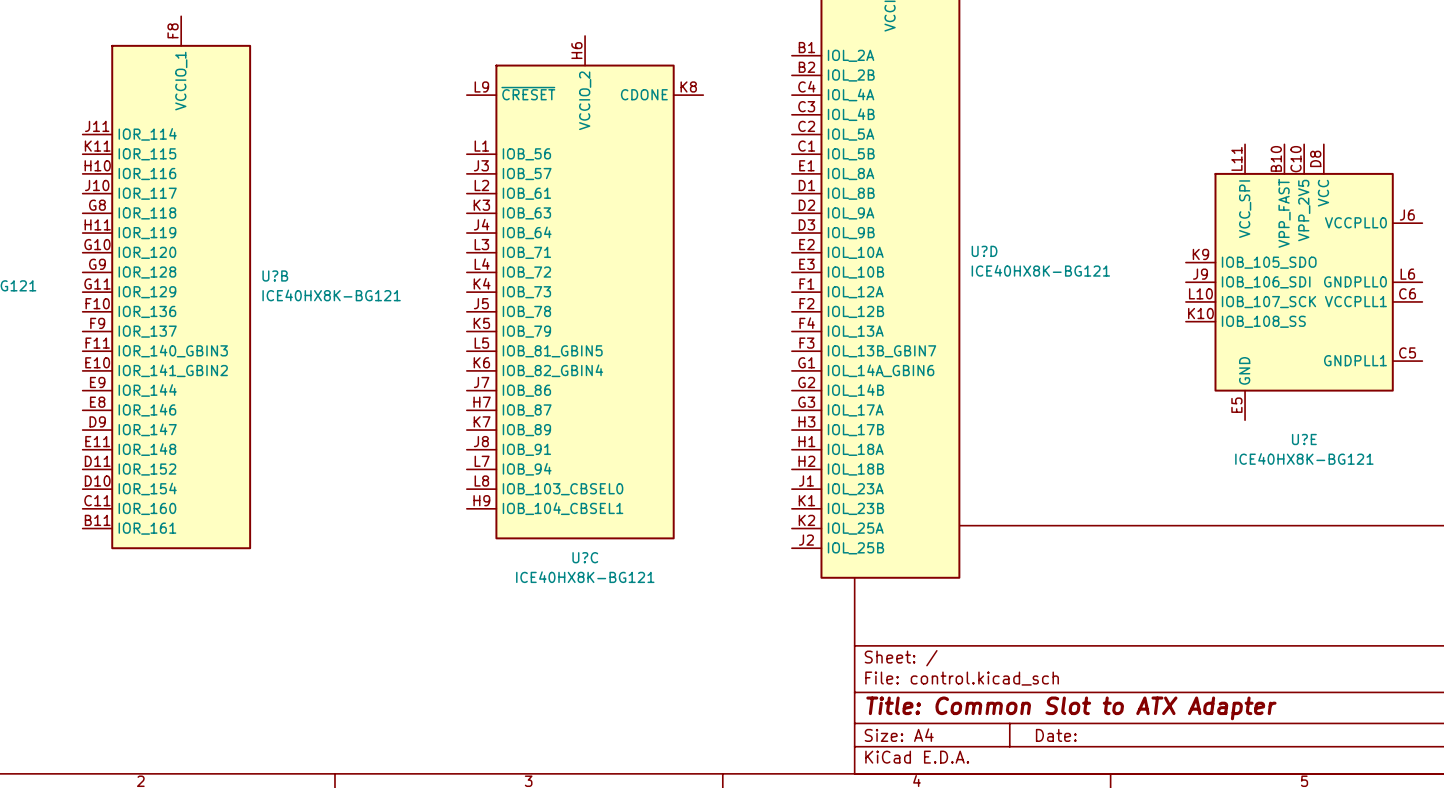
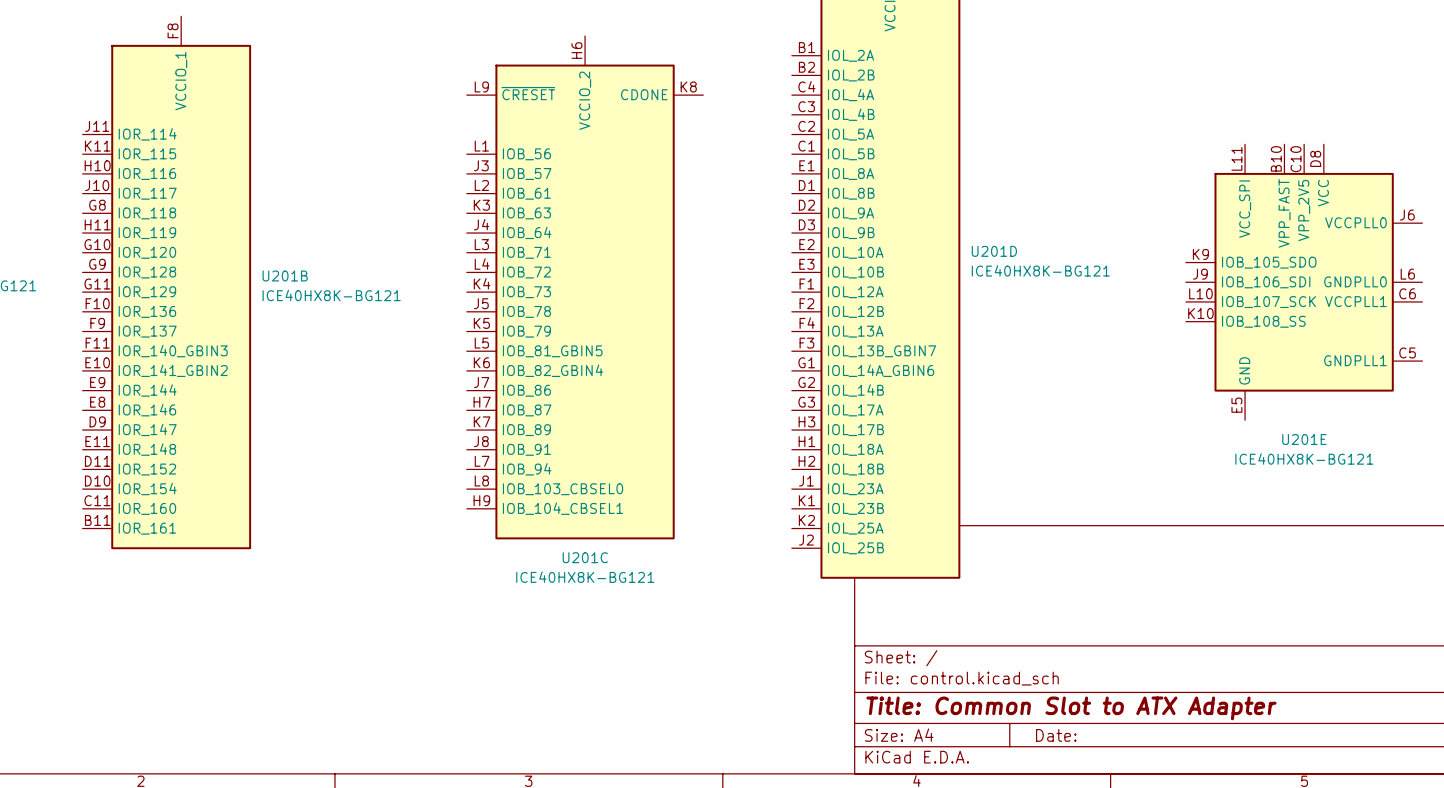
U?D name: U?D (984, 251) -> U201D (994, 251)
U?B name: U?B (275, 275) -> U201B (285, 275)
U?E name: U?E (1304, 439) -> U201E (1304, 439)
U?C name: U?C (585, 557) -> U201C (585, 557)

